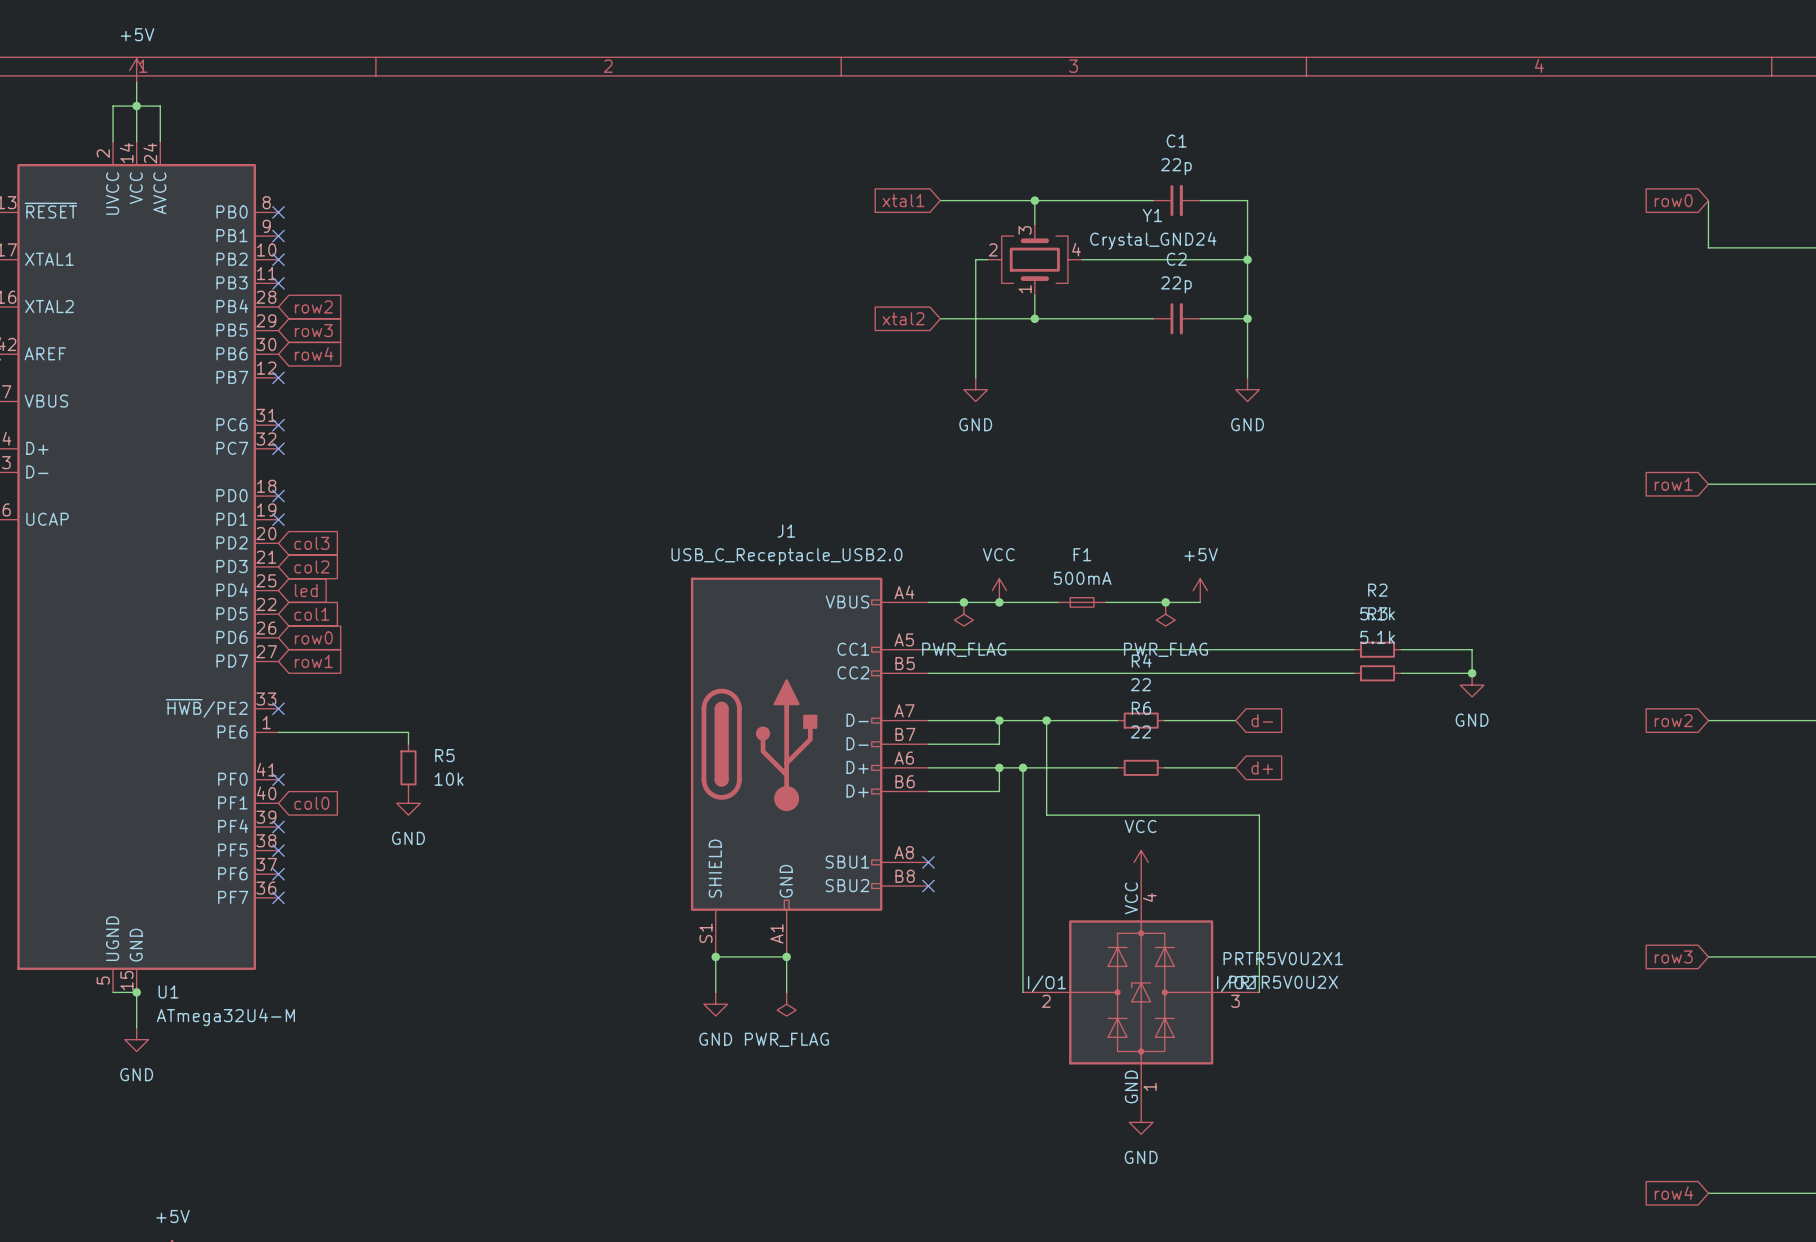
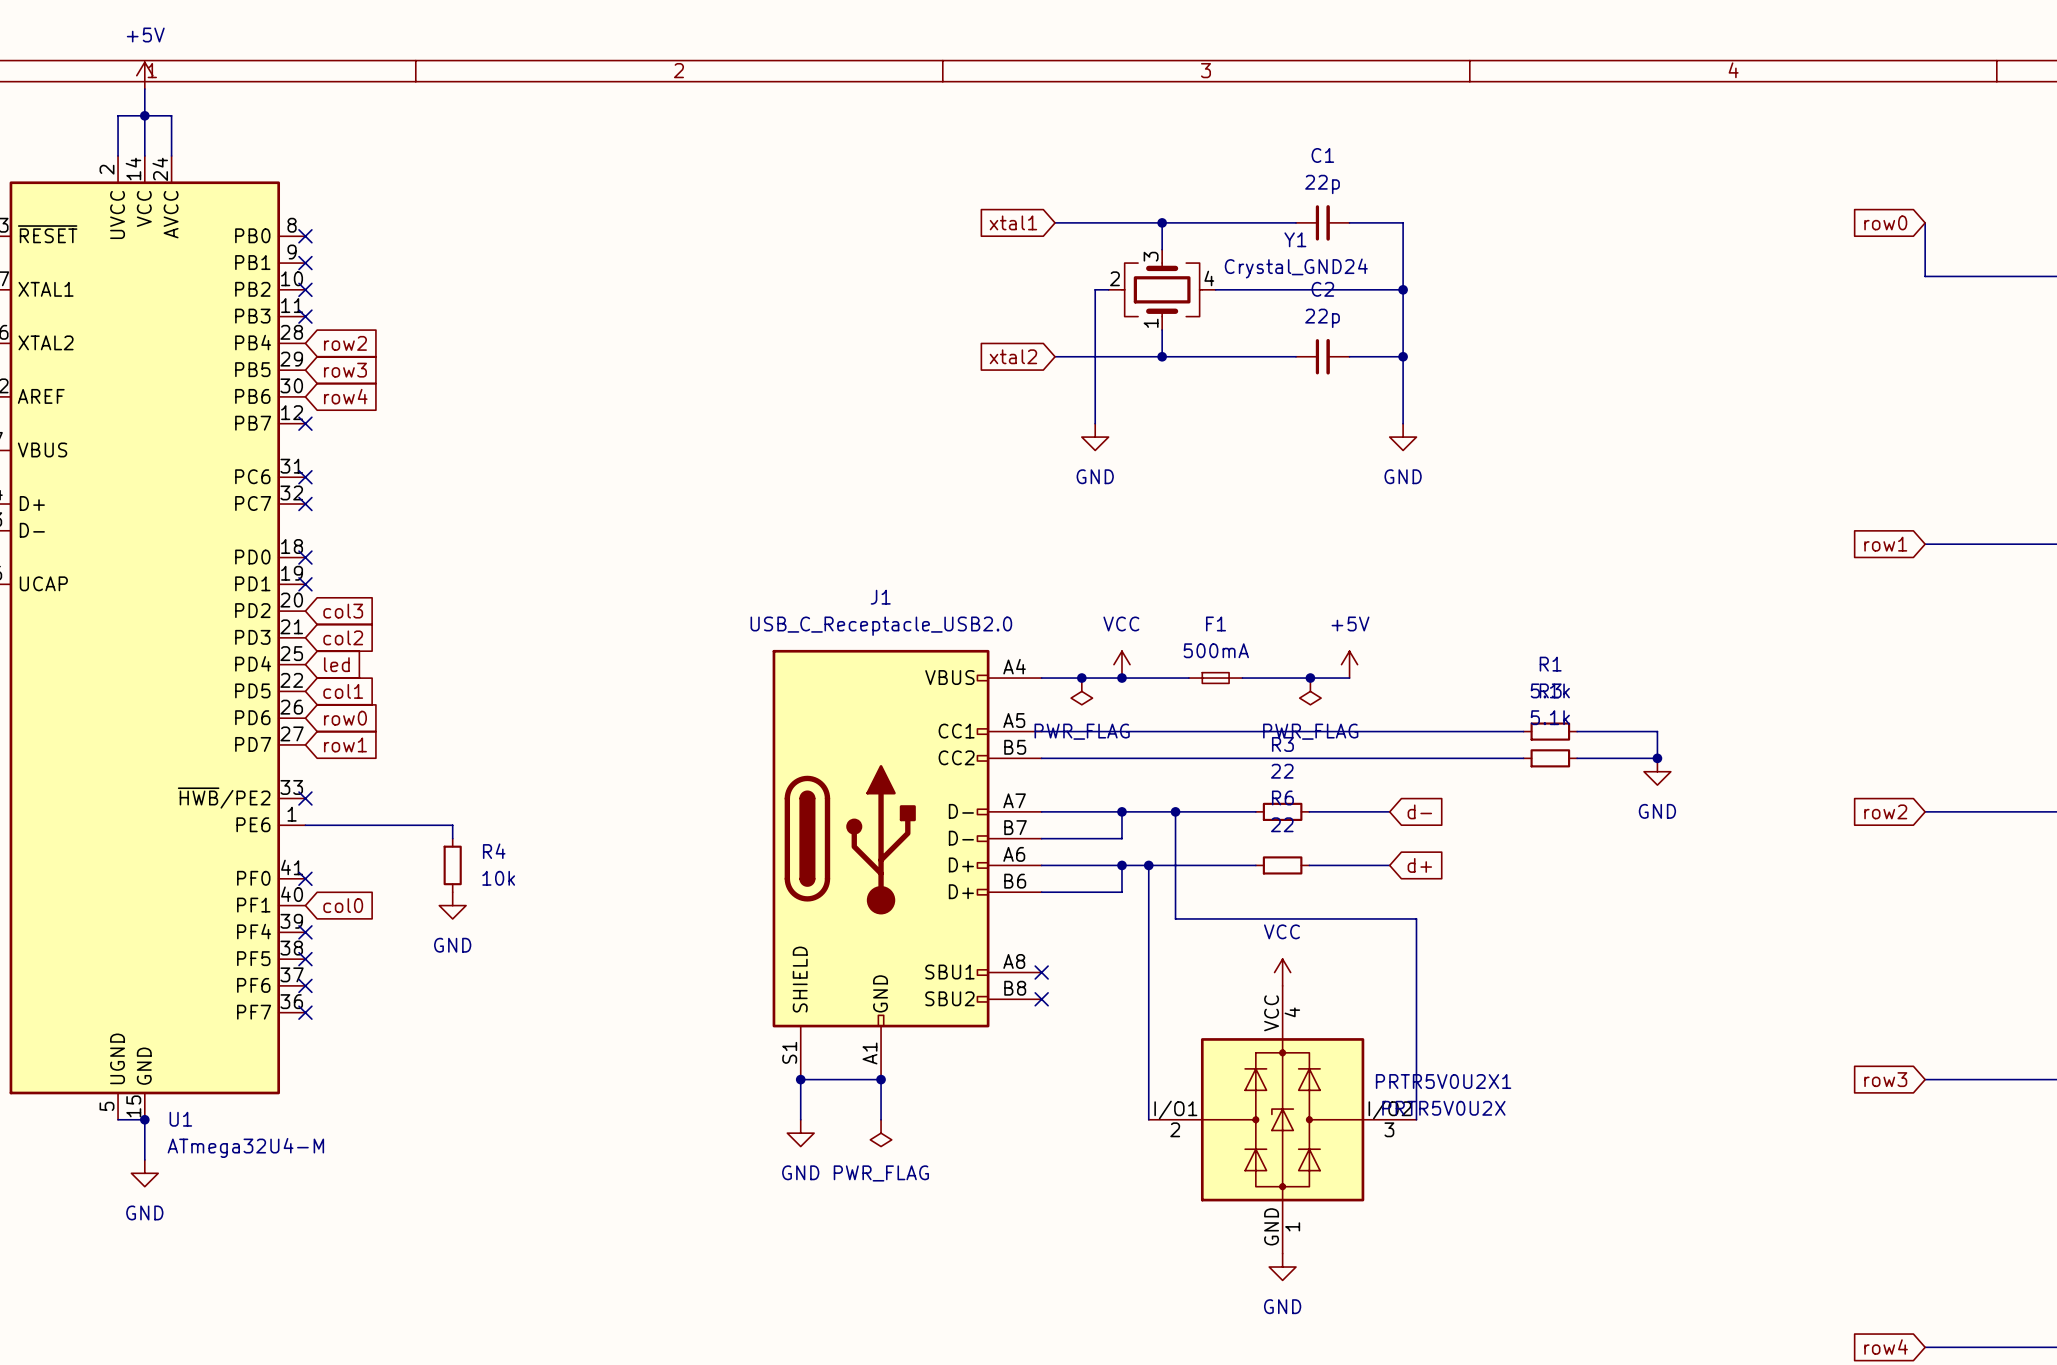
R2 name: R2 (1377, 590) -> R1 (1550, 664)
R4 name: R4 (1141, 660) -> R3 (1282, 744)
R5 name: R5 (444, 755) -> R4 (494, 851)

